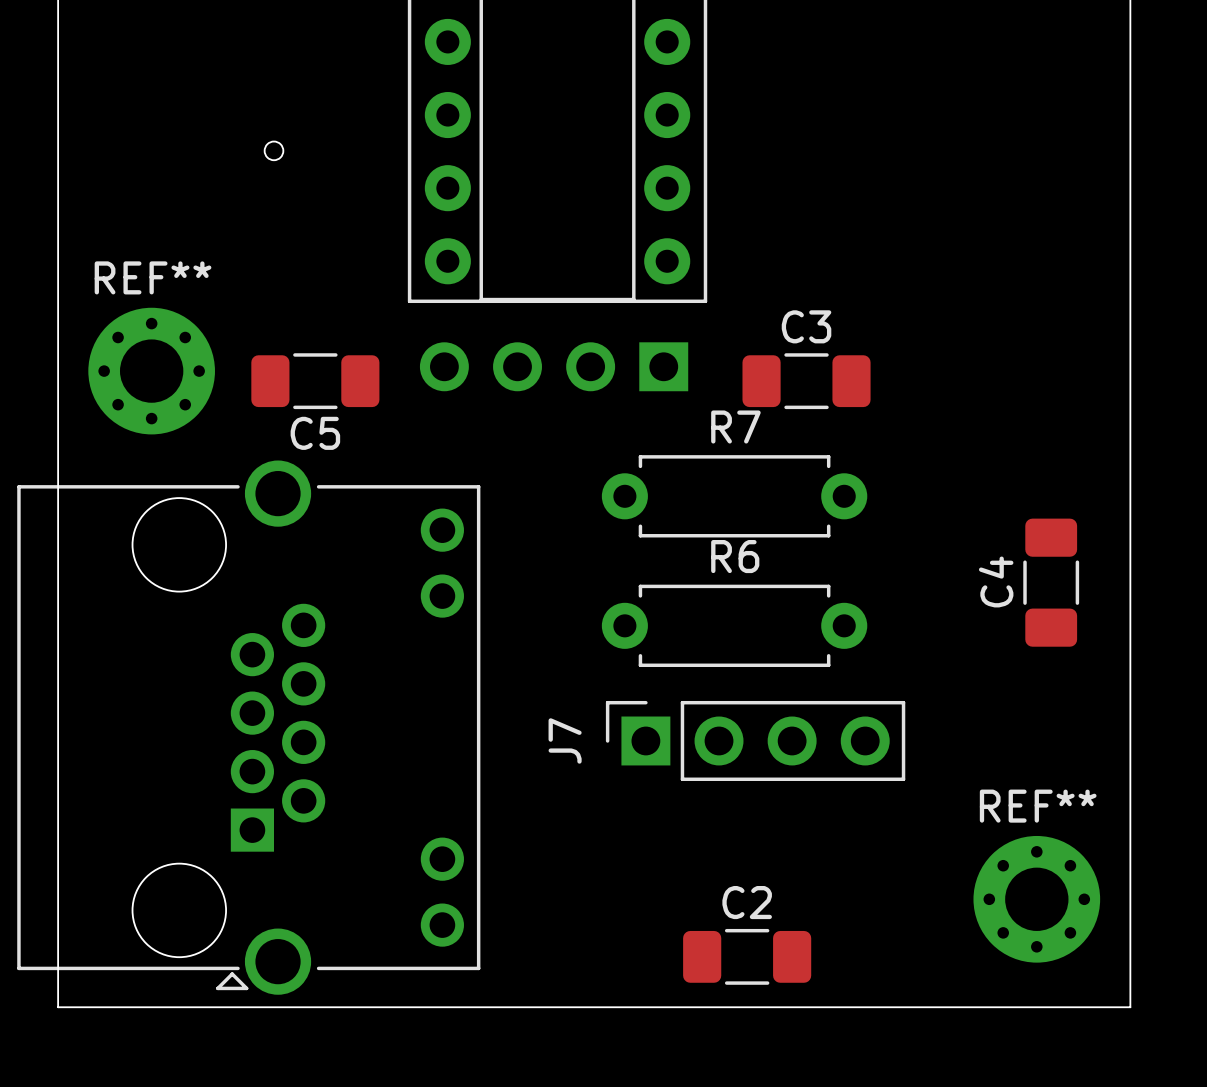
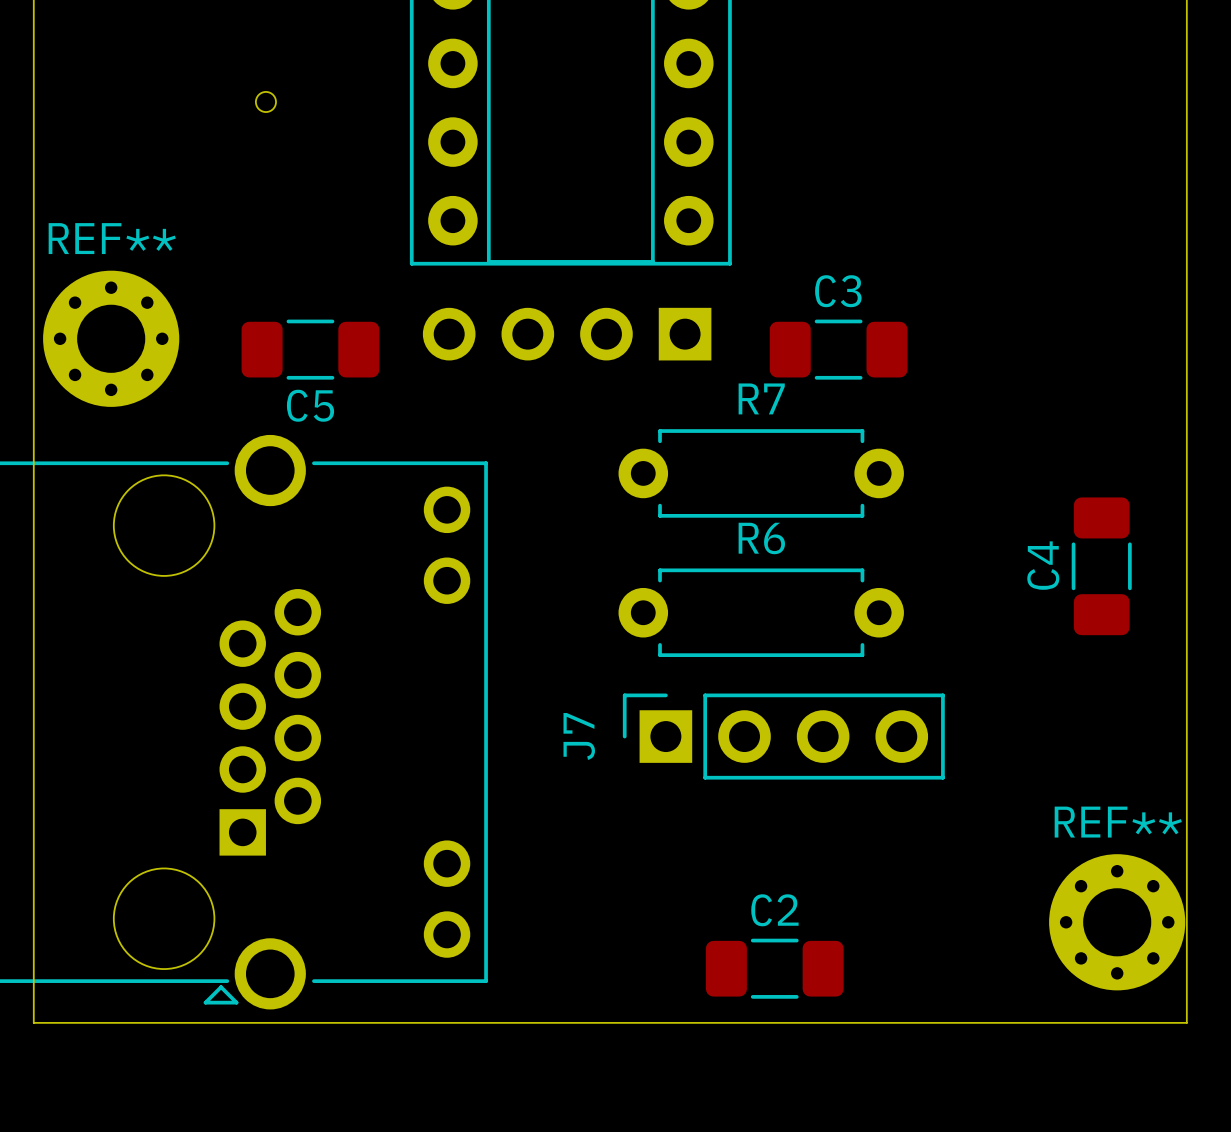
REF** position: (151, 371) -> (111, 338)
REF** position: (1036, 899) -> (1117, 922)

